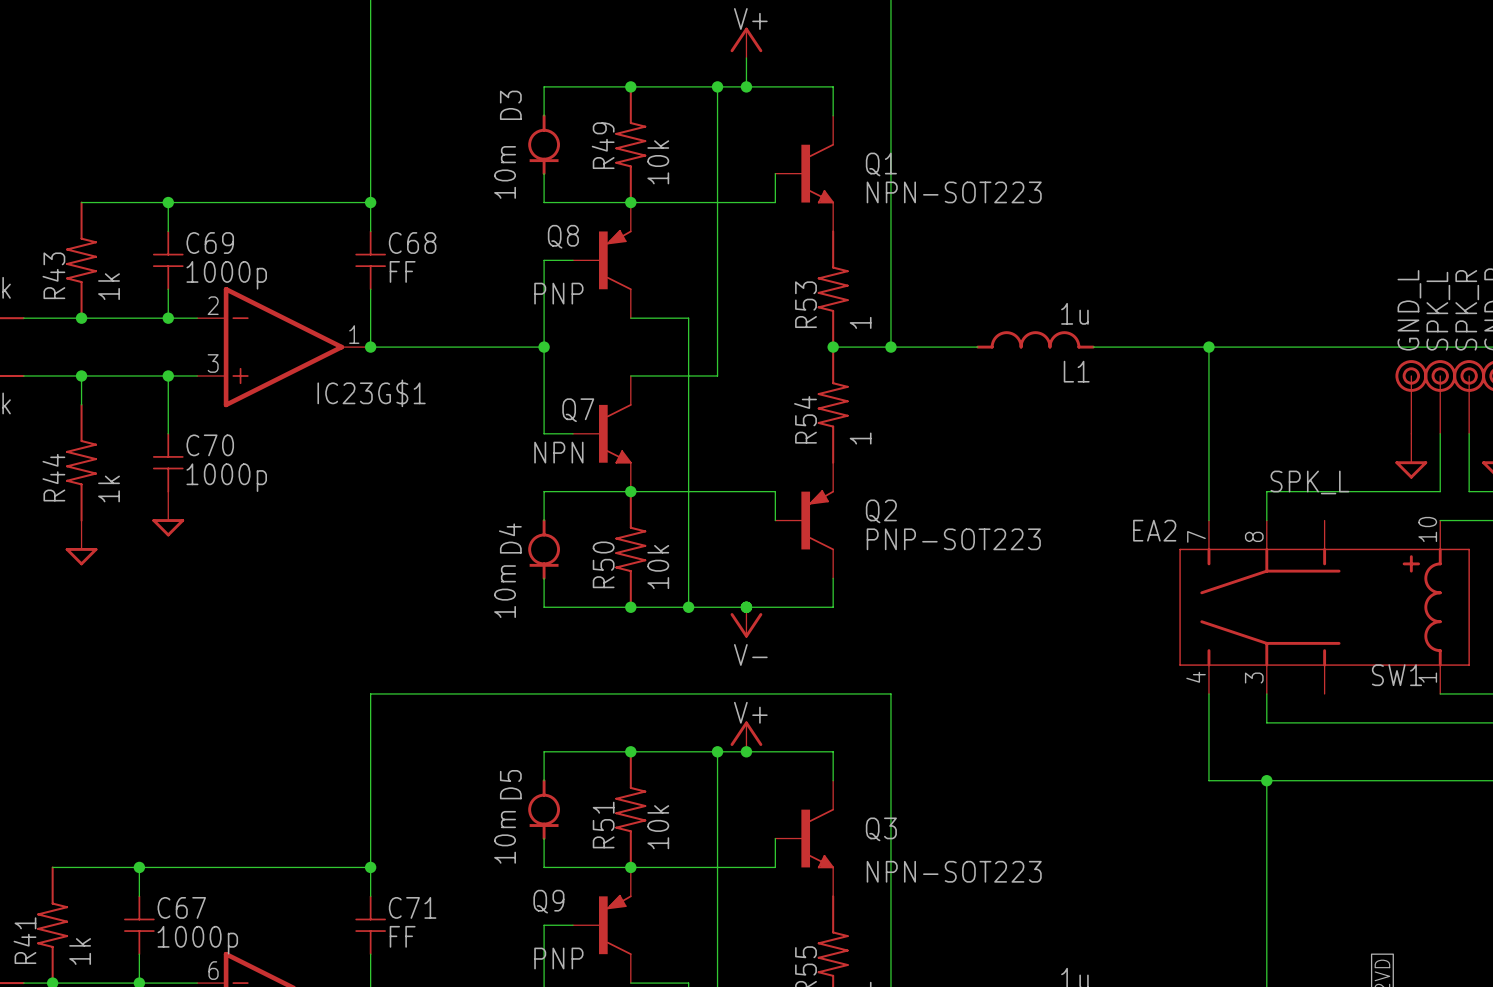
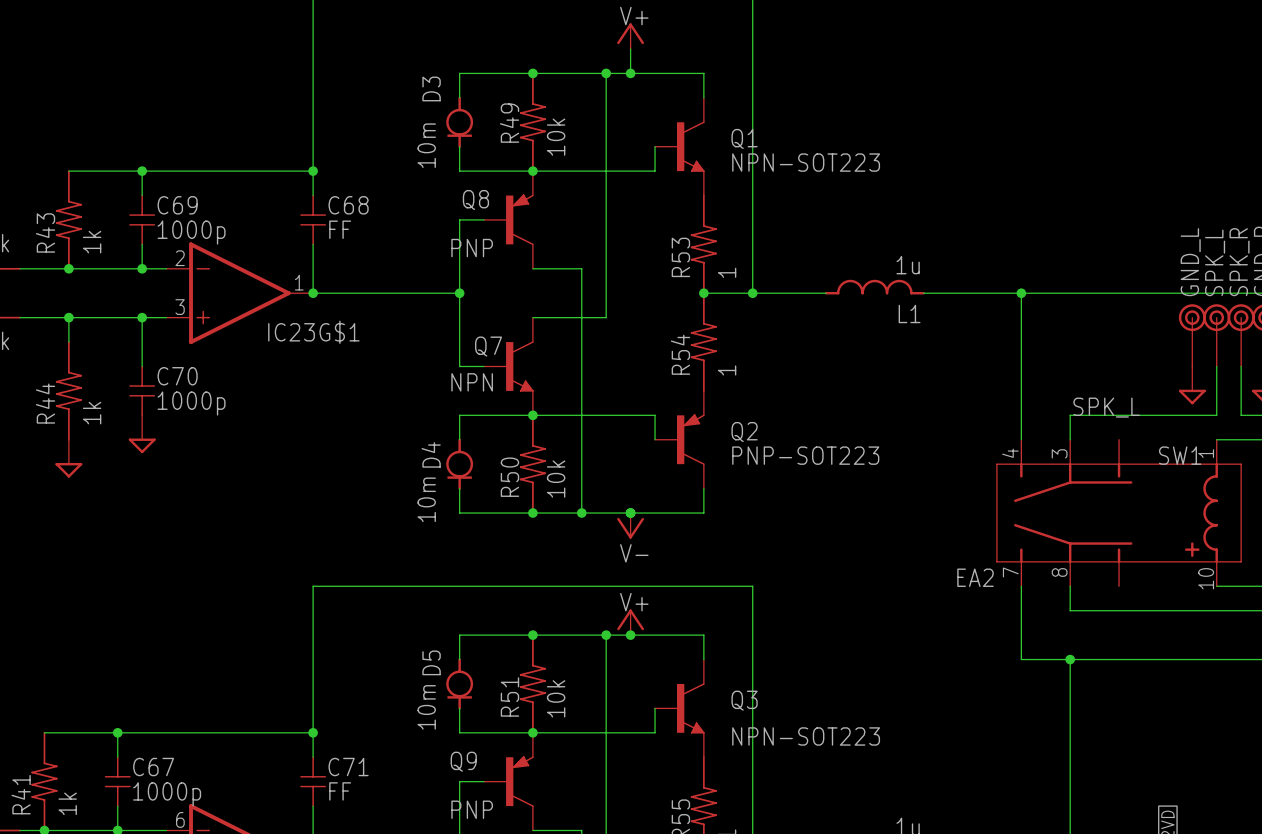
SW1 flip: as is (1324, 607) -> up-down (1119, 513)

